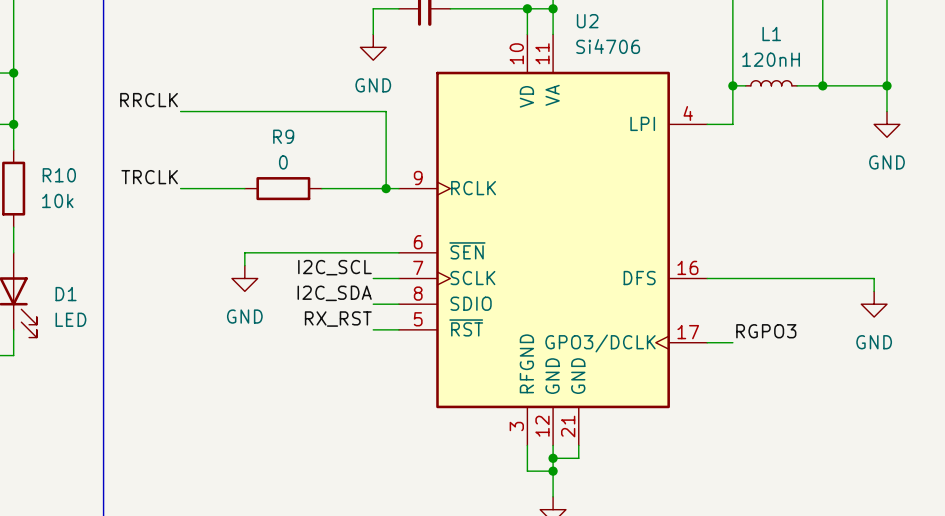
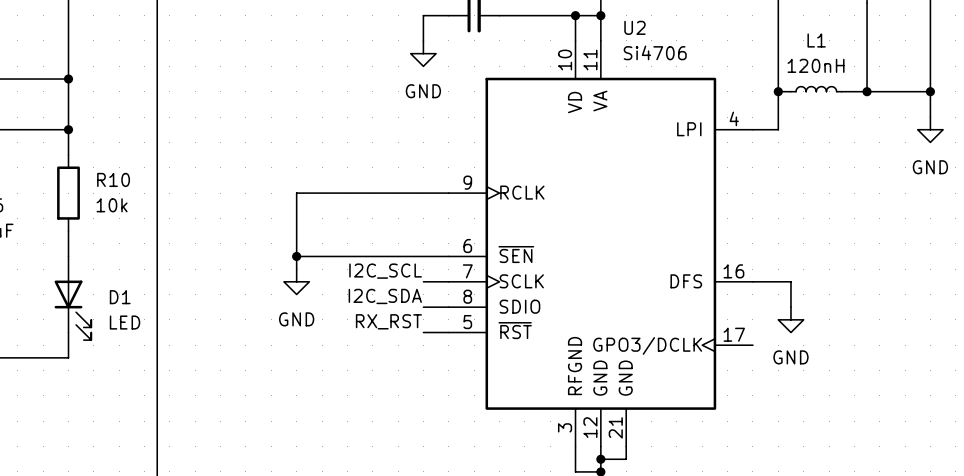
label: RRCLK (149, 100) -> none
wire: (180, 111) (386, 111) (386, 188) -> none
label: TRCLK (149, 177) -> none
wire: (180, 188) (244, 188) -> none
R9: 0 (283, 188) -> none
wire: none -> (372, 193) (296, 193) (296, 256)
junction: (386, 188) -> none
junction: none -> (296, 256)
wire: (745, 278) (874, 278) (874, 291) -> (790, 281) (790, 307)
power symbol position: GND (874, 304) -> GND (790, 319)
label: RGPO3 (766, 331) -> none
wire: (707, 342) (732, 342) -> none

